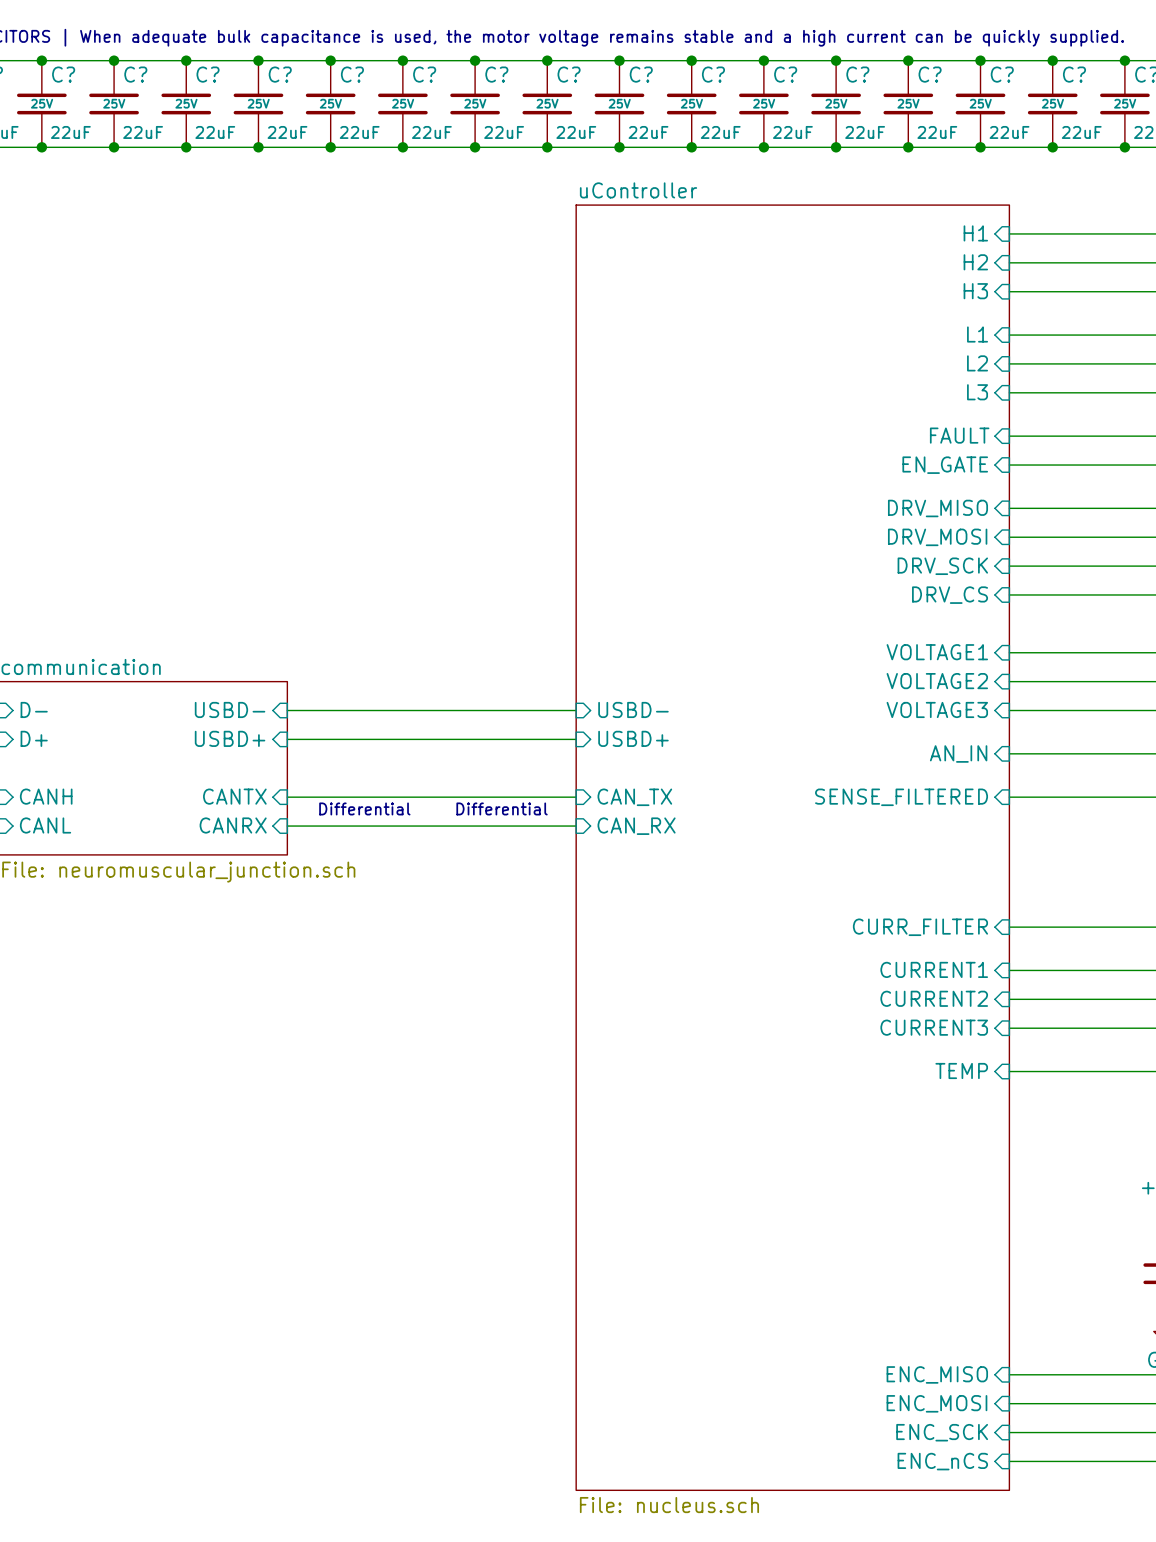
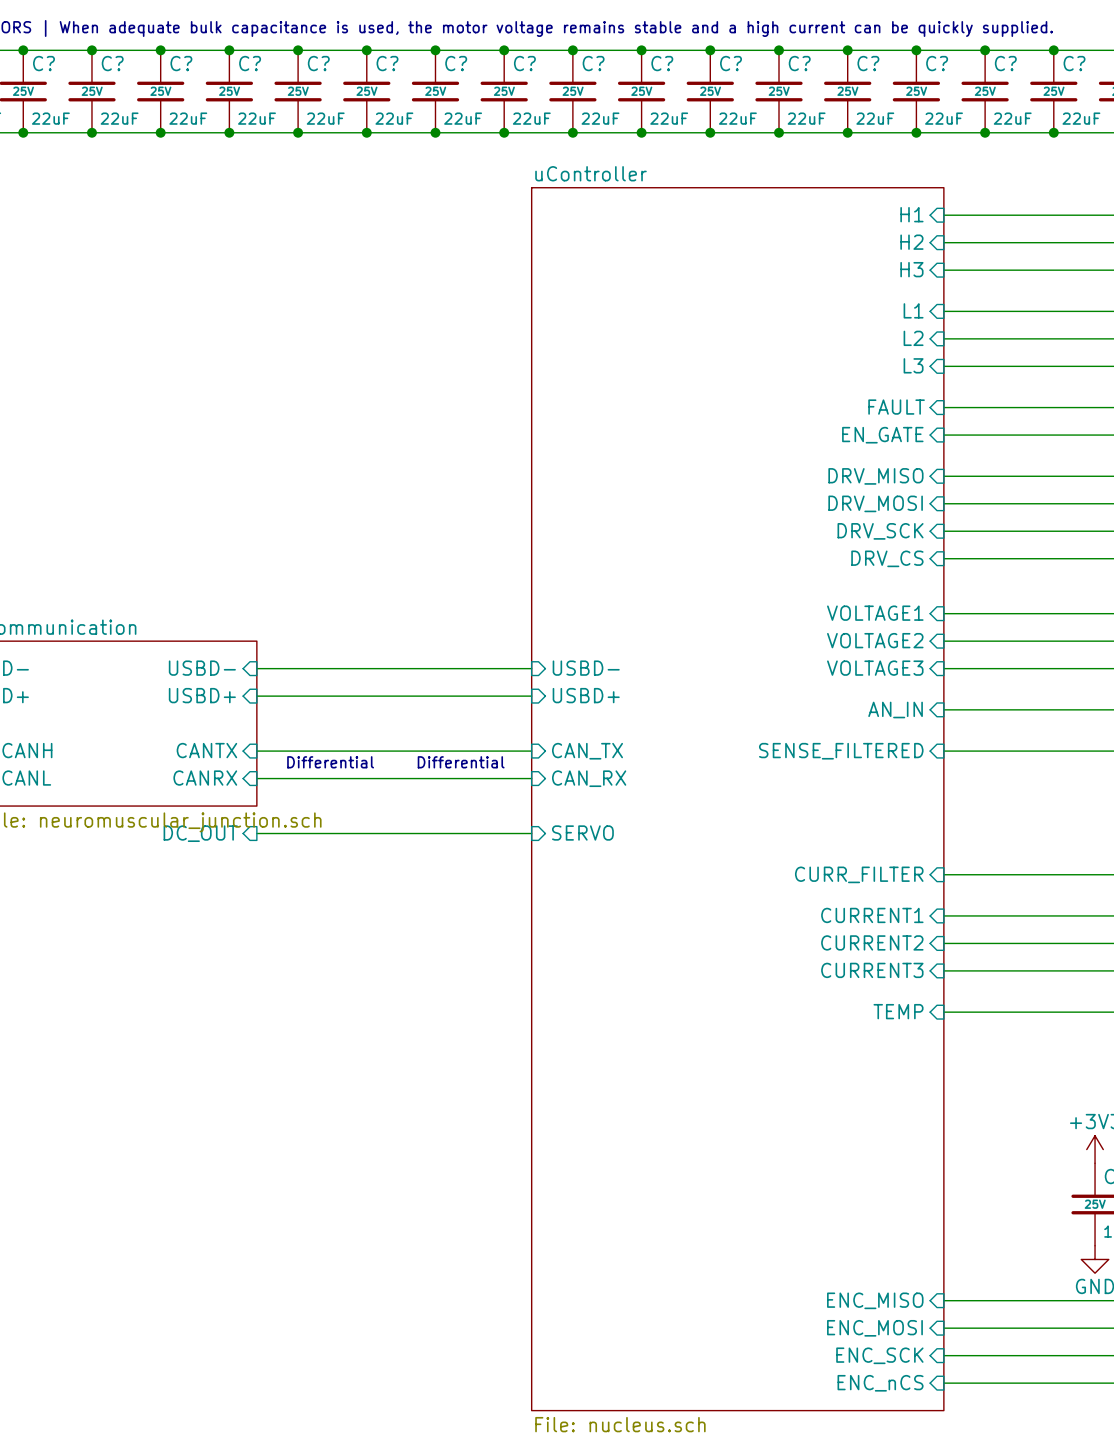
sheet pin: none -> DC_OUT (200, 833)
wire: none -> (256, 833) (531, 833)
sheet pin: none -> SERVO (582, 833)

